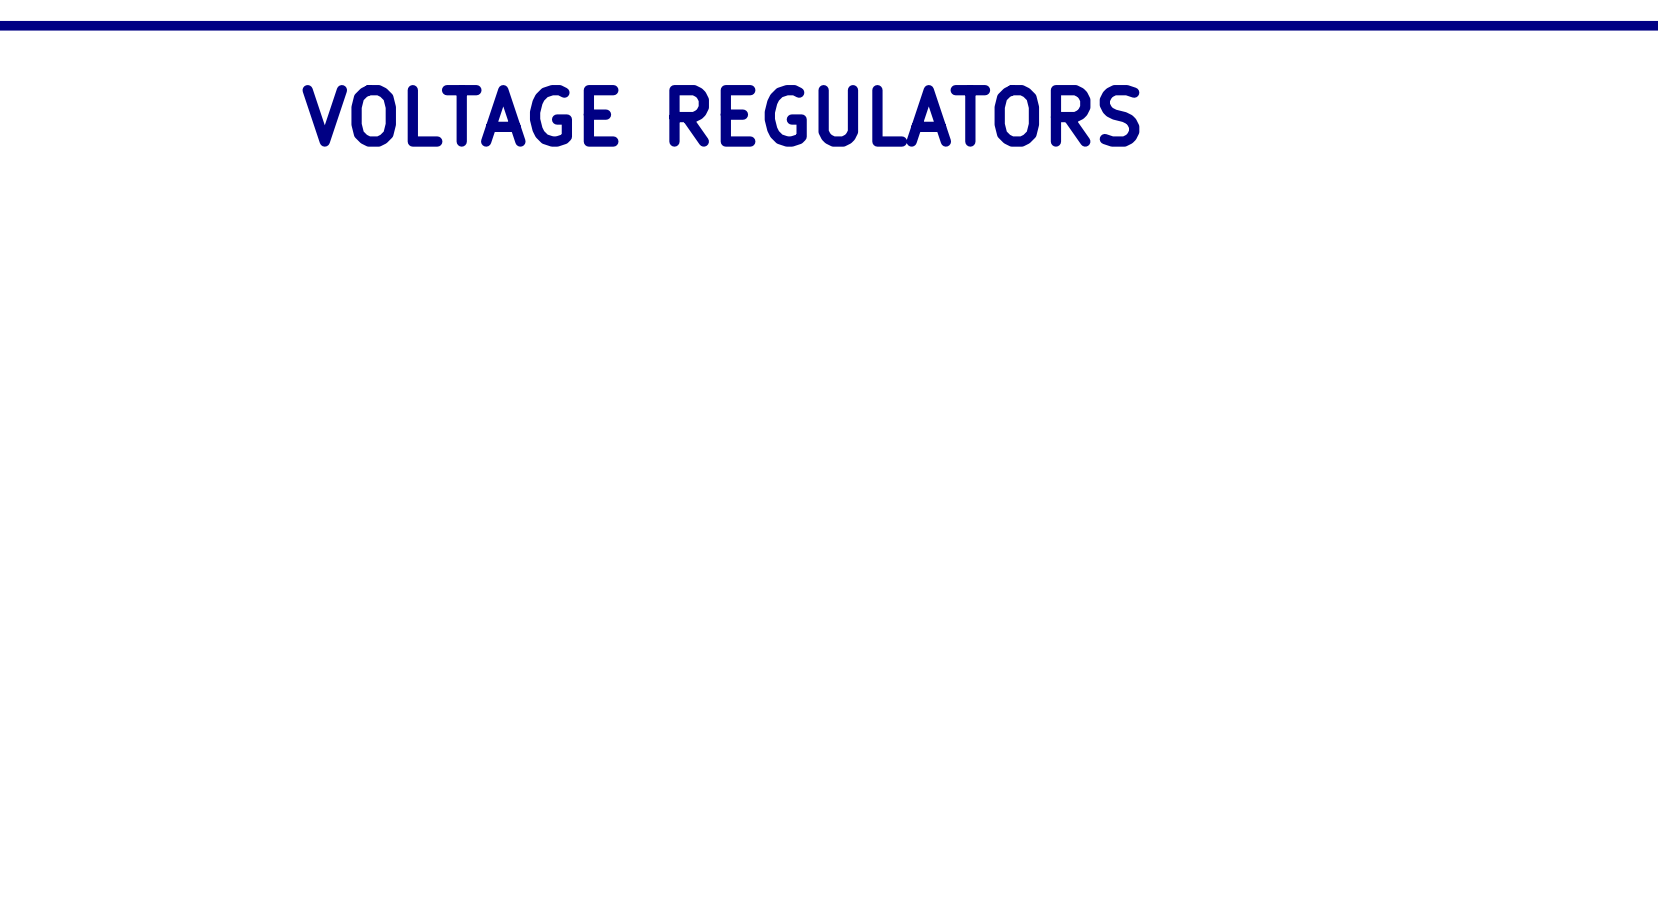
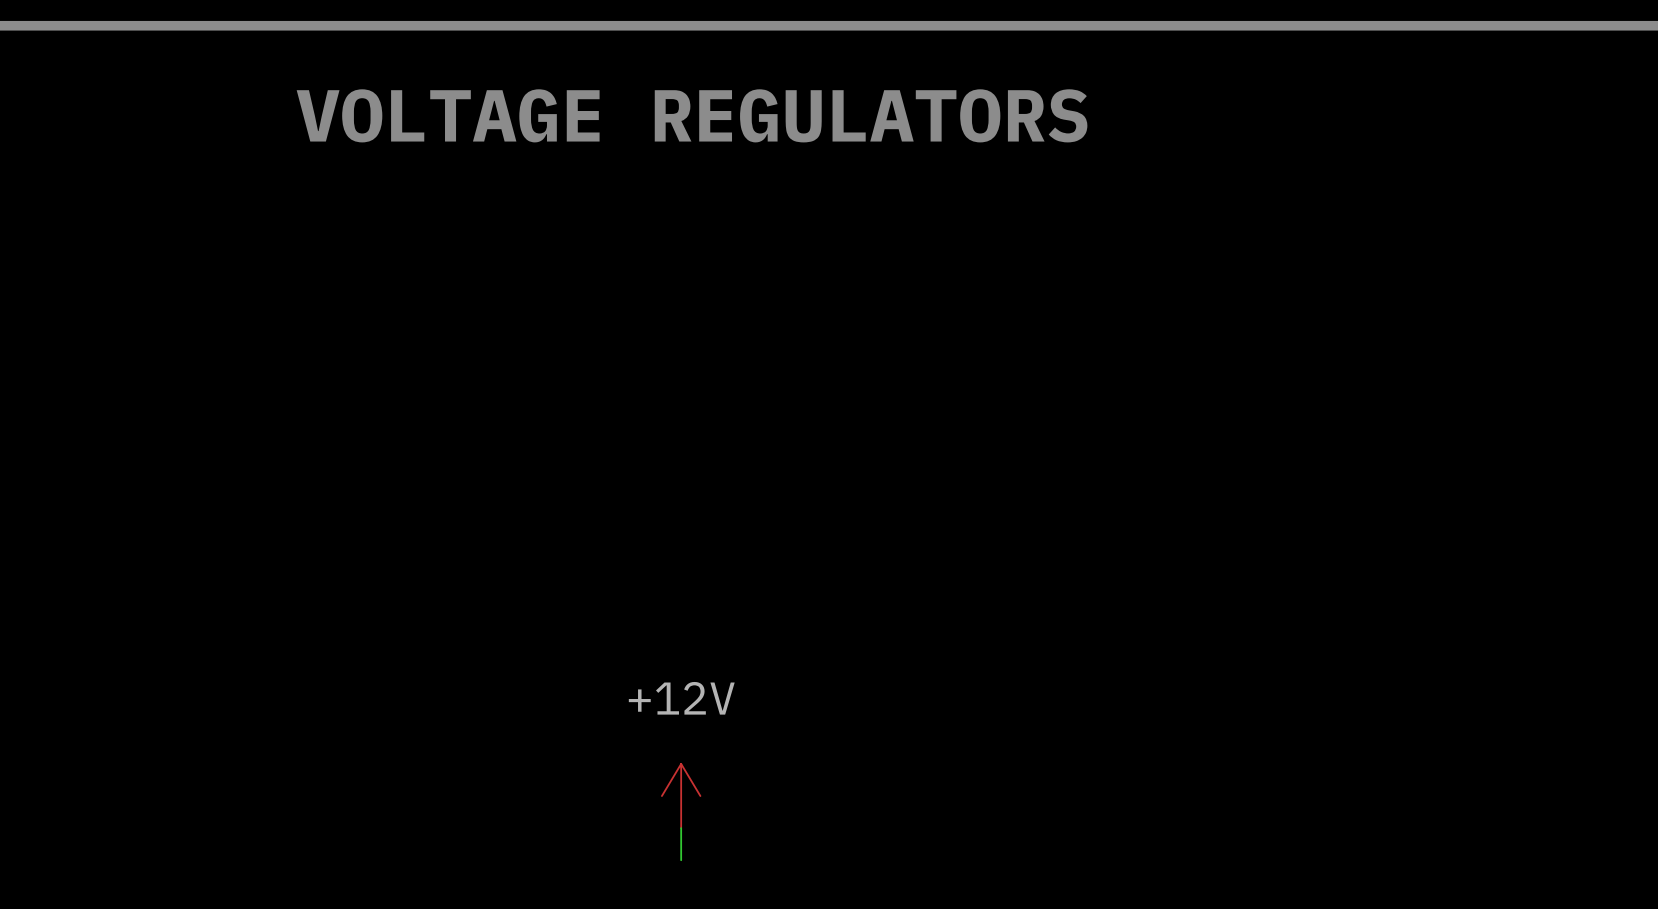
power symbol: none -> +12V (681, 796)
wire: none -> (681, 828) (681, 860)

